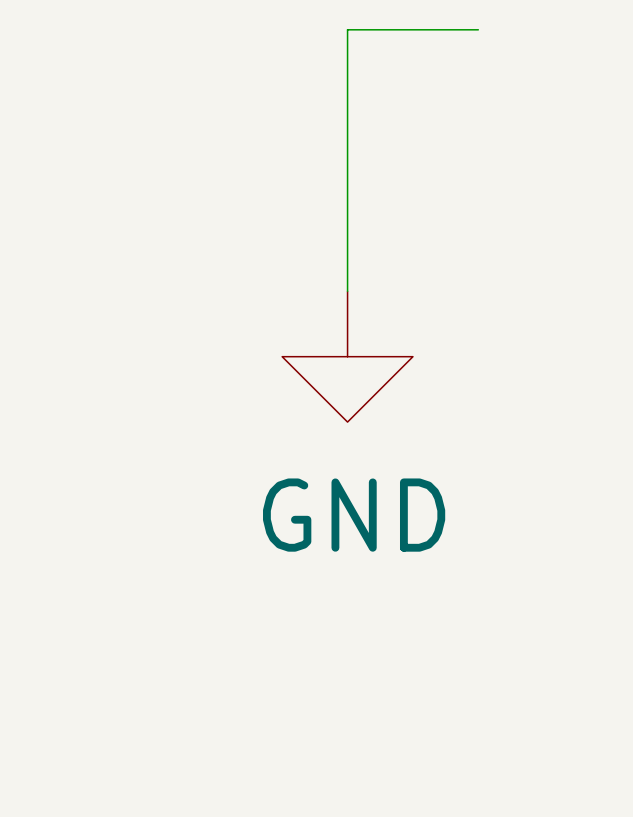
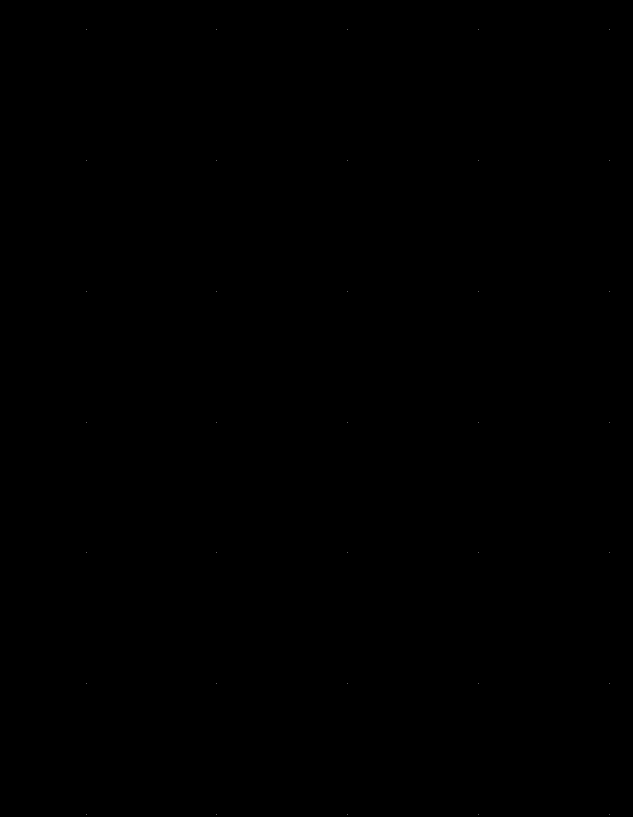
wire: (478, 29) (347, 29) (347, 291) -> none
power symbol: GND (347, 356) -> none

